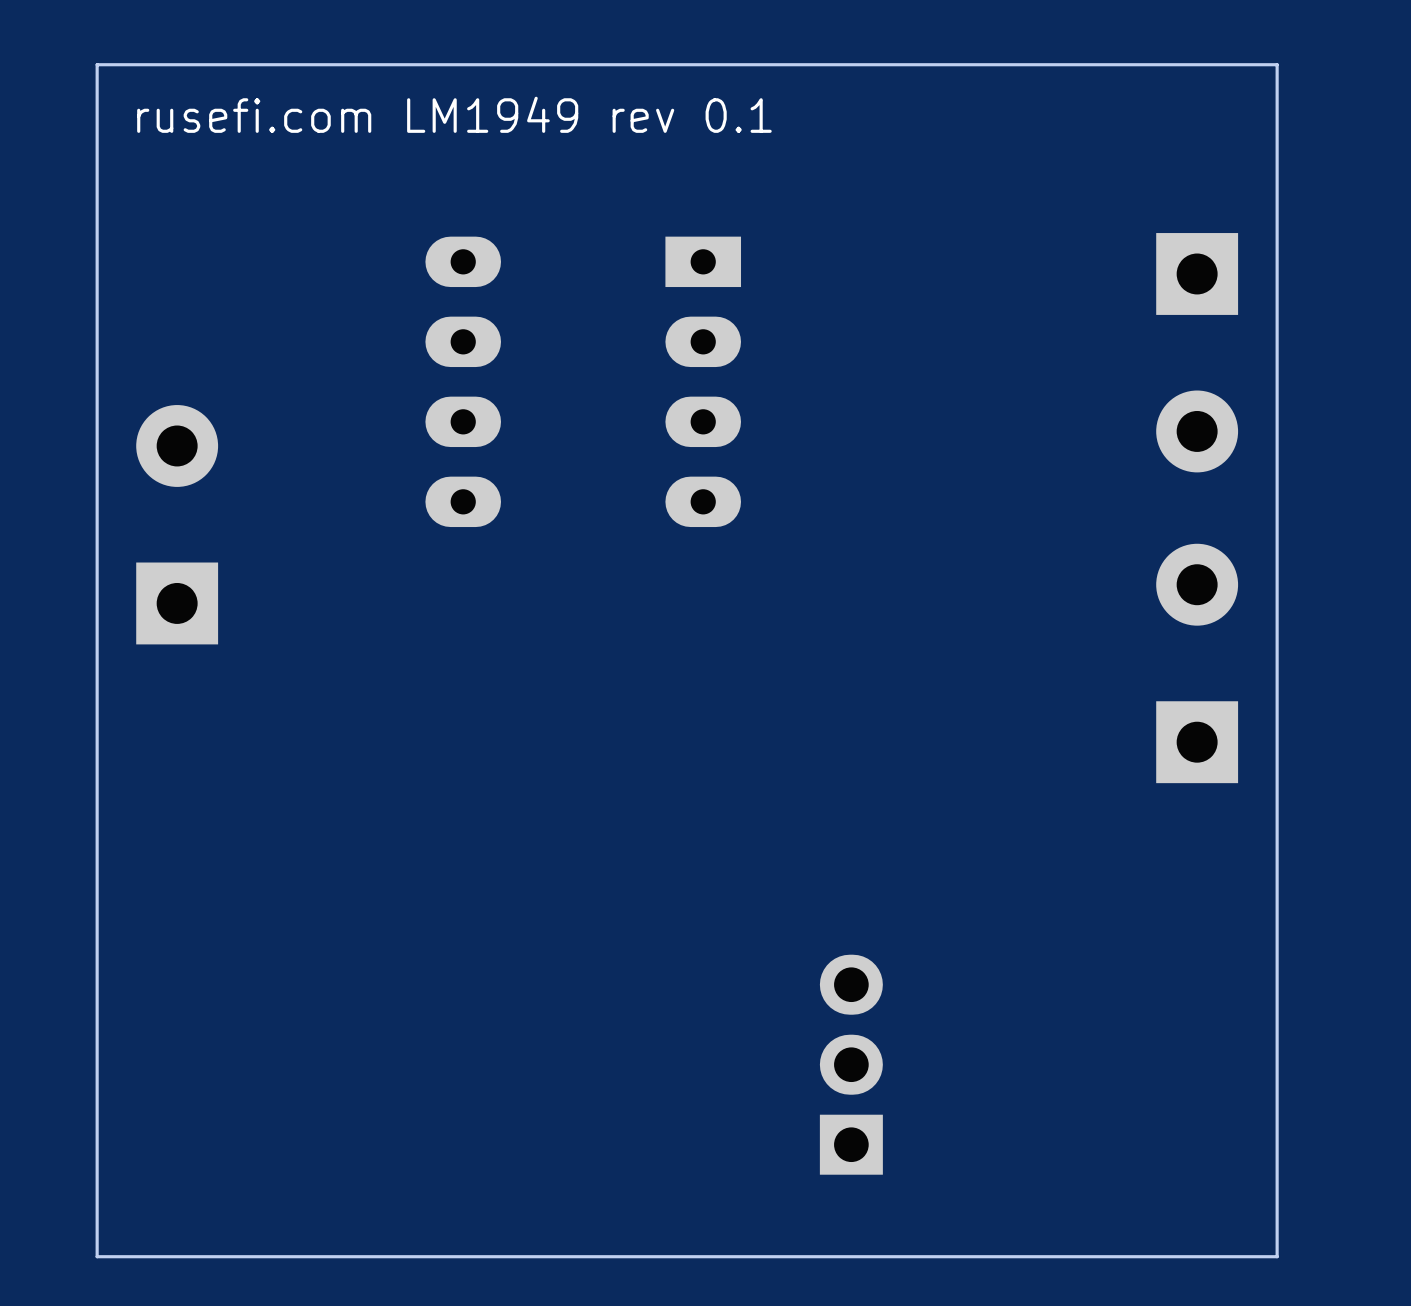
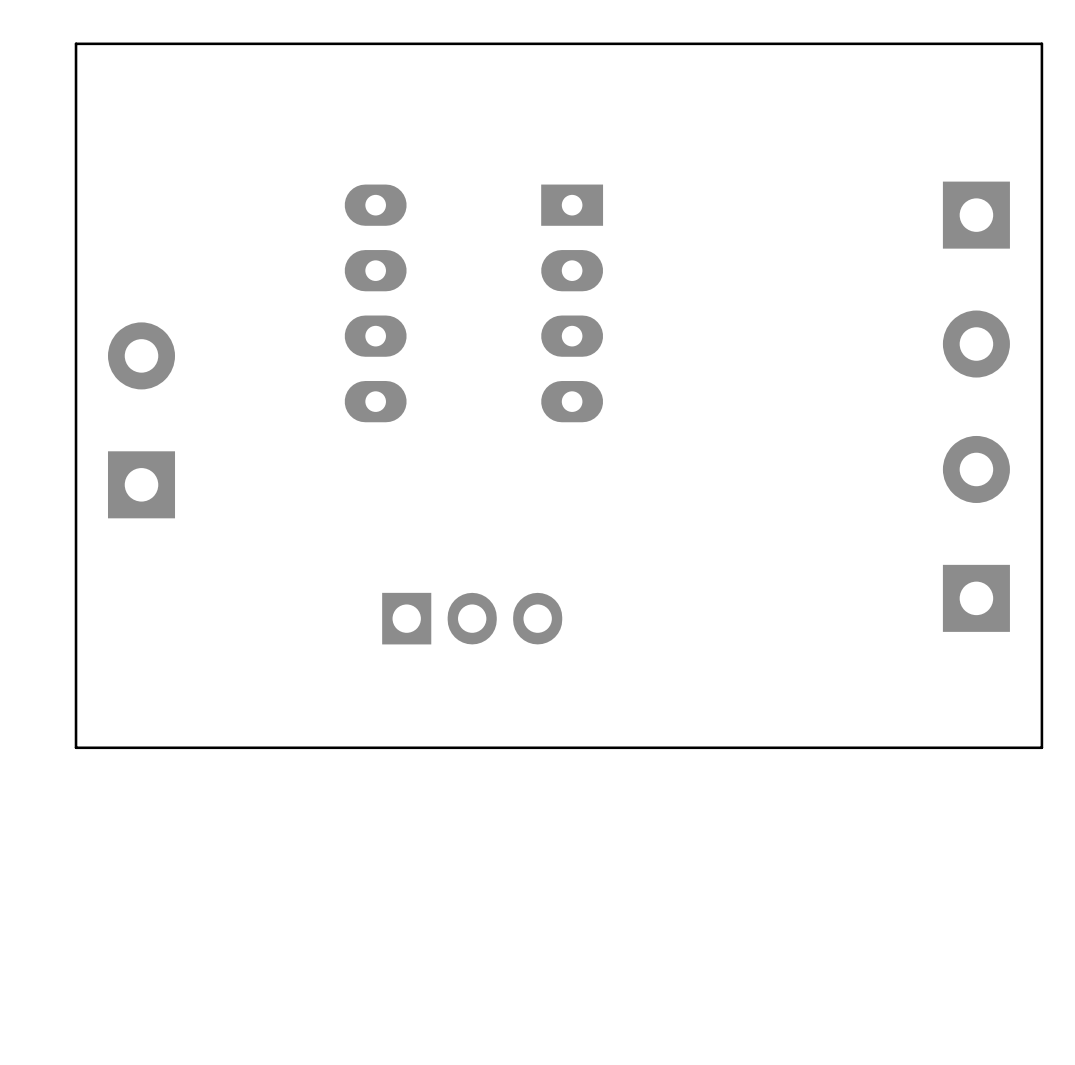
text: rusefi.com LM1949 rev 0.1 (454, 114) -> none
board edge: (1277, 924) (1277, 1256) (97, 1256) (97, 924) -> (1041, 747) (76, 747)
part rotation: 0° (851, 1064) -> 90° clockwise (472, 618)
part position: (851, 1064) -> (472, 618)

